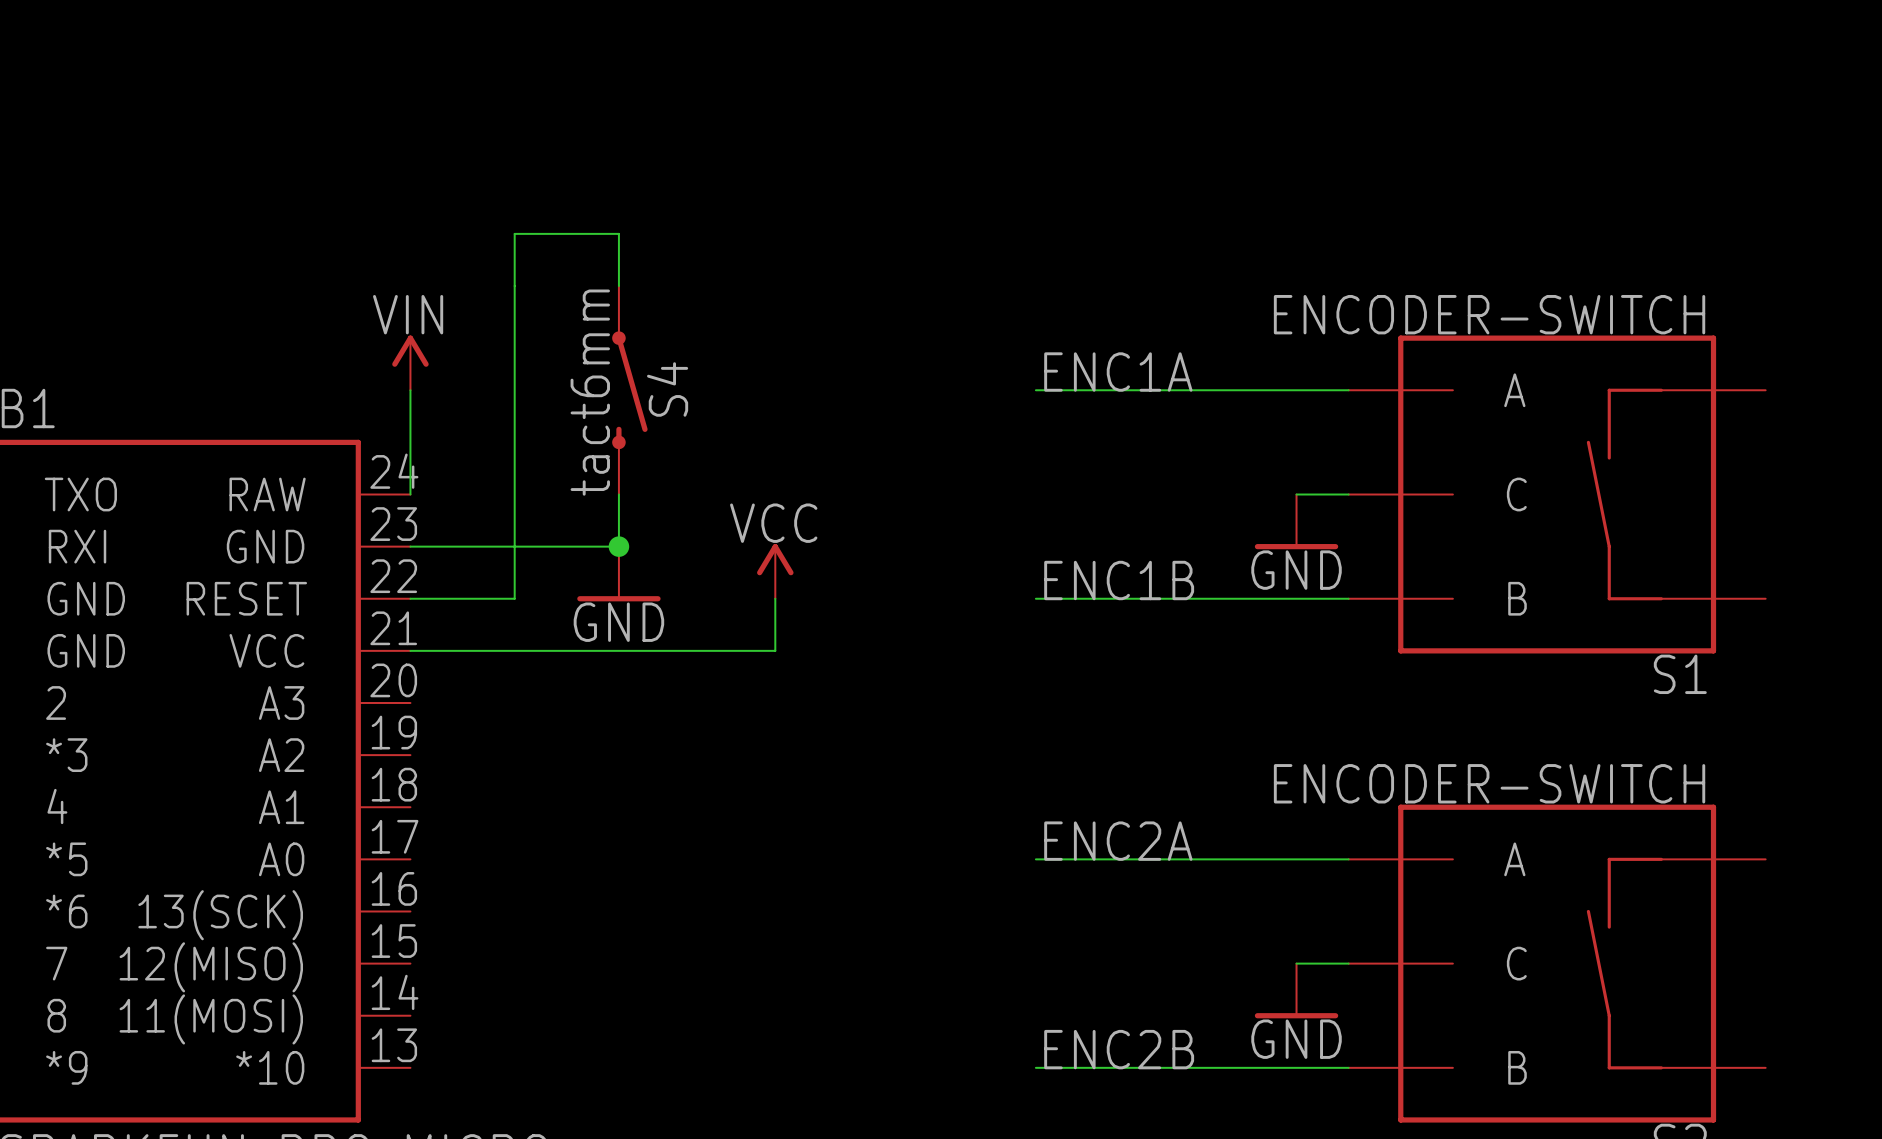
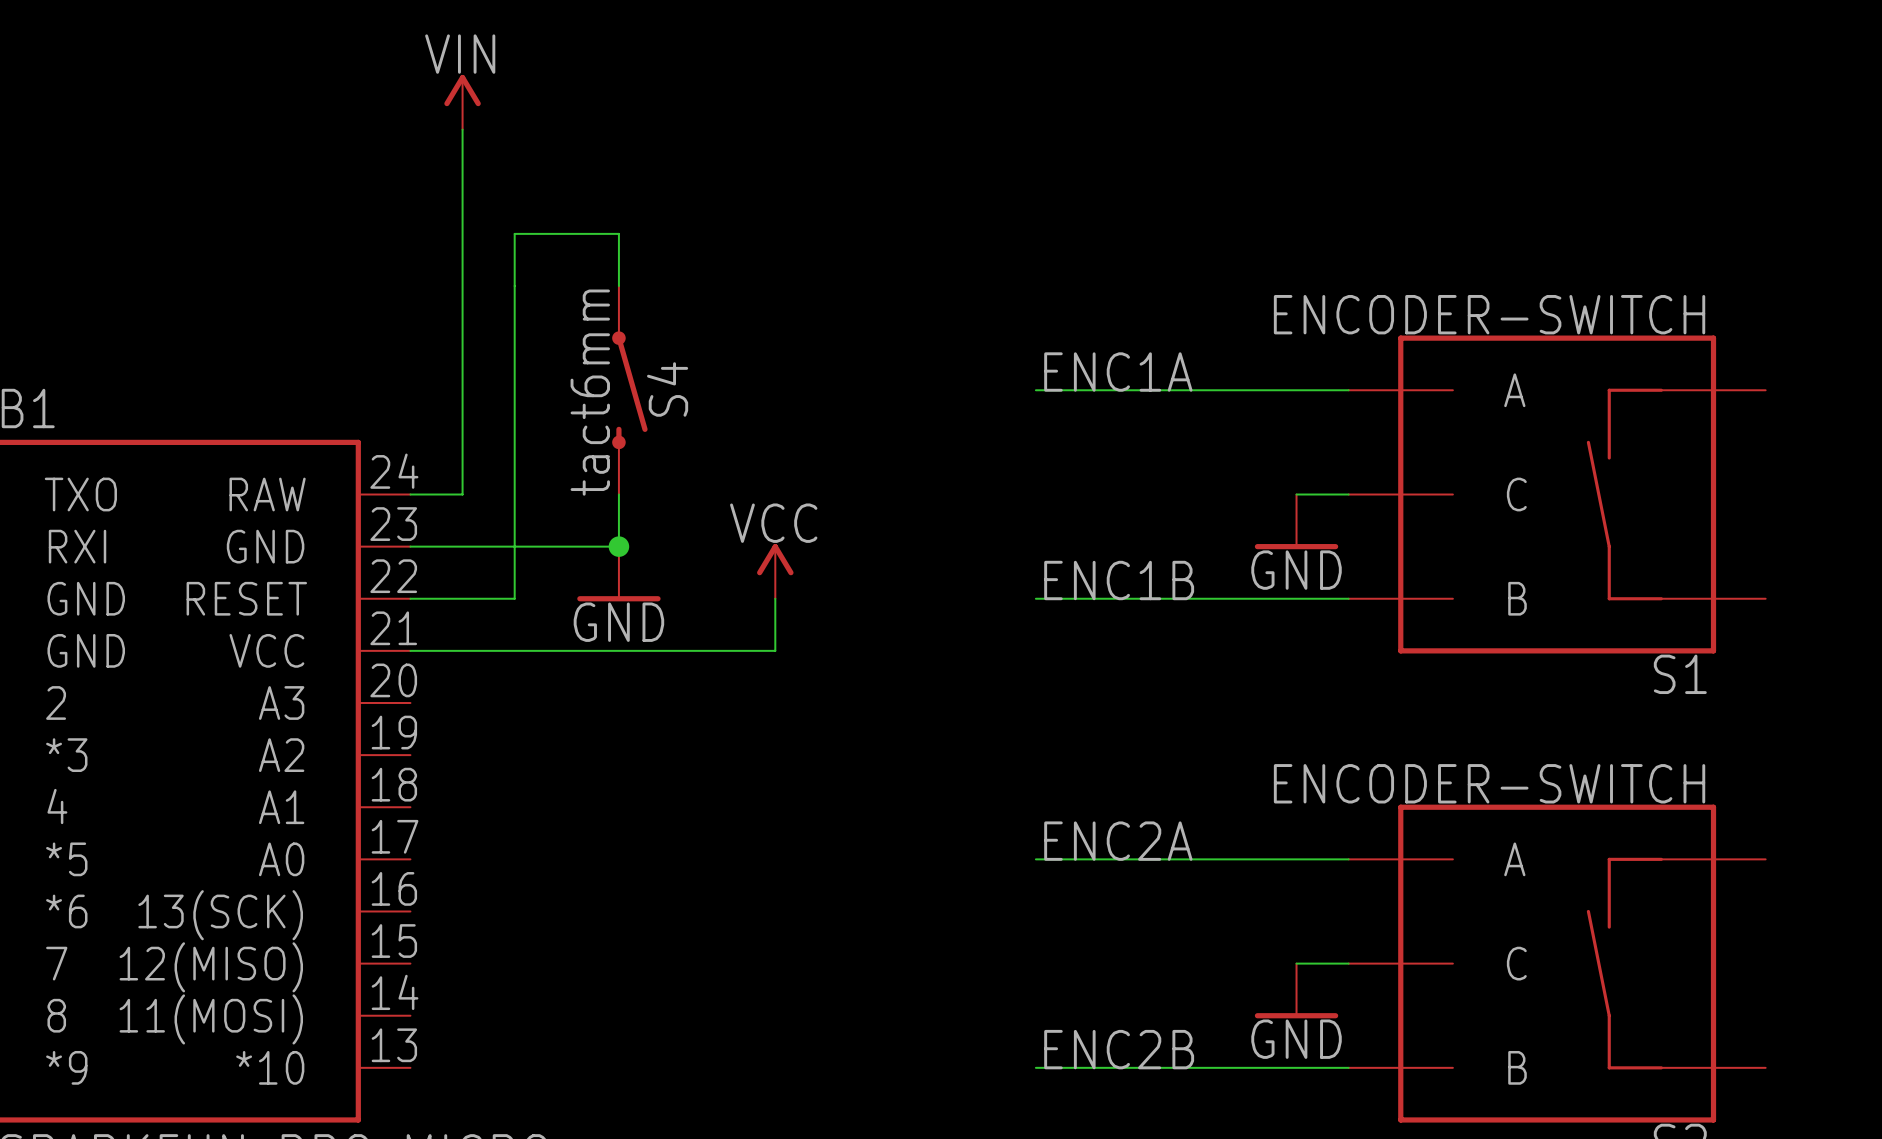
power symbol position: VIN (410, 362) -> VIN (462, 102)
wire: (410, 390) (410, 494) -> (462, 129) (462, 494) (410, 494)

